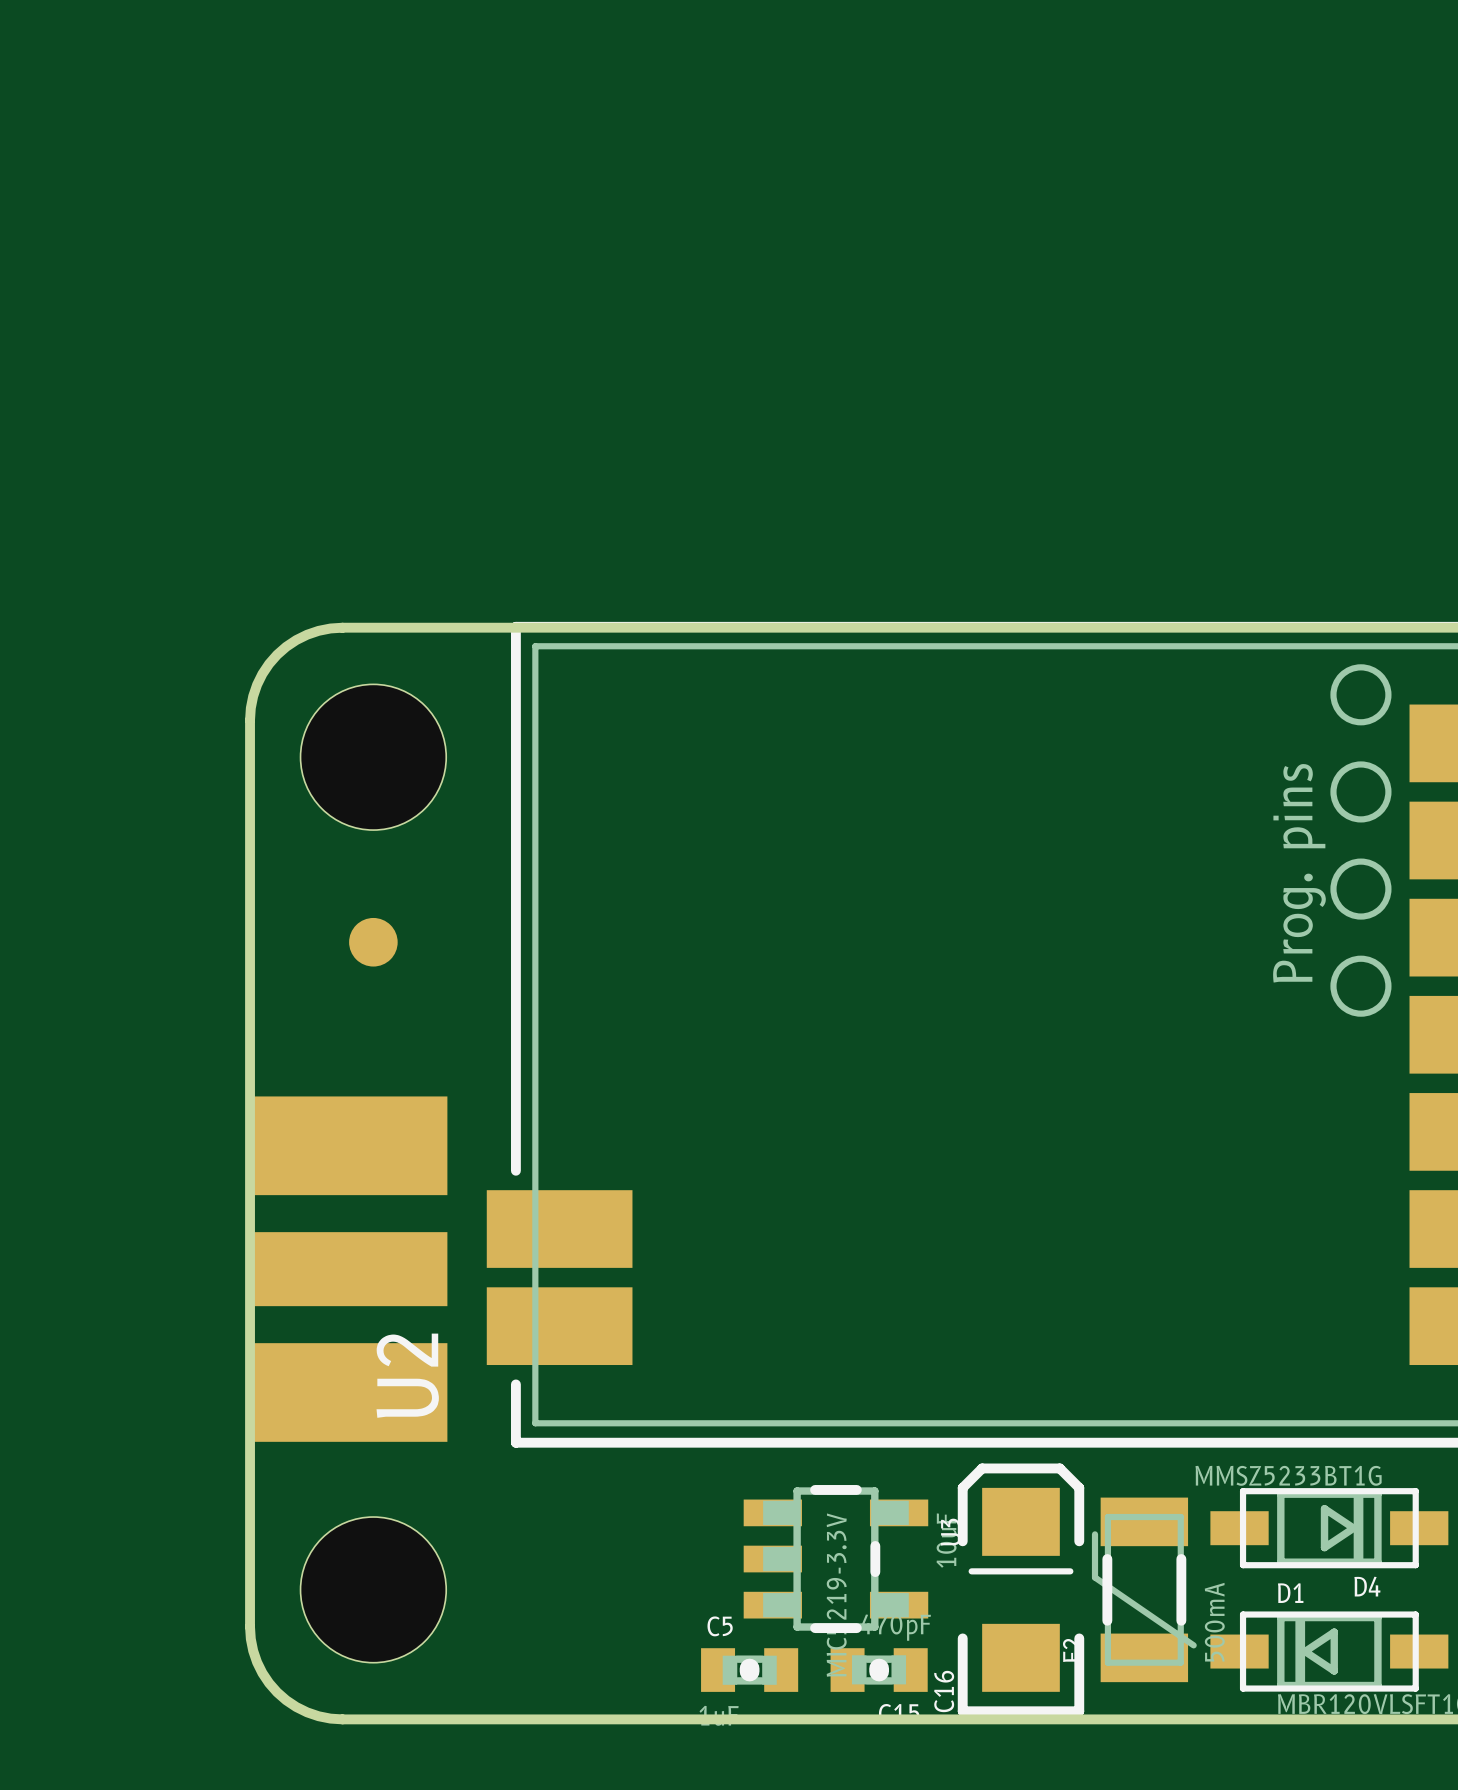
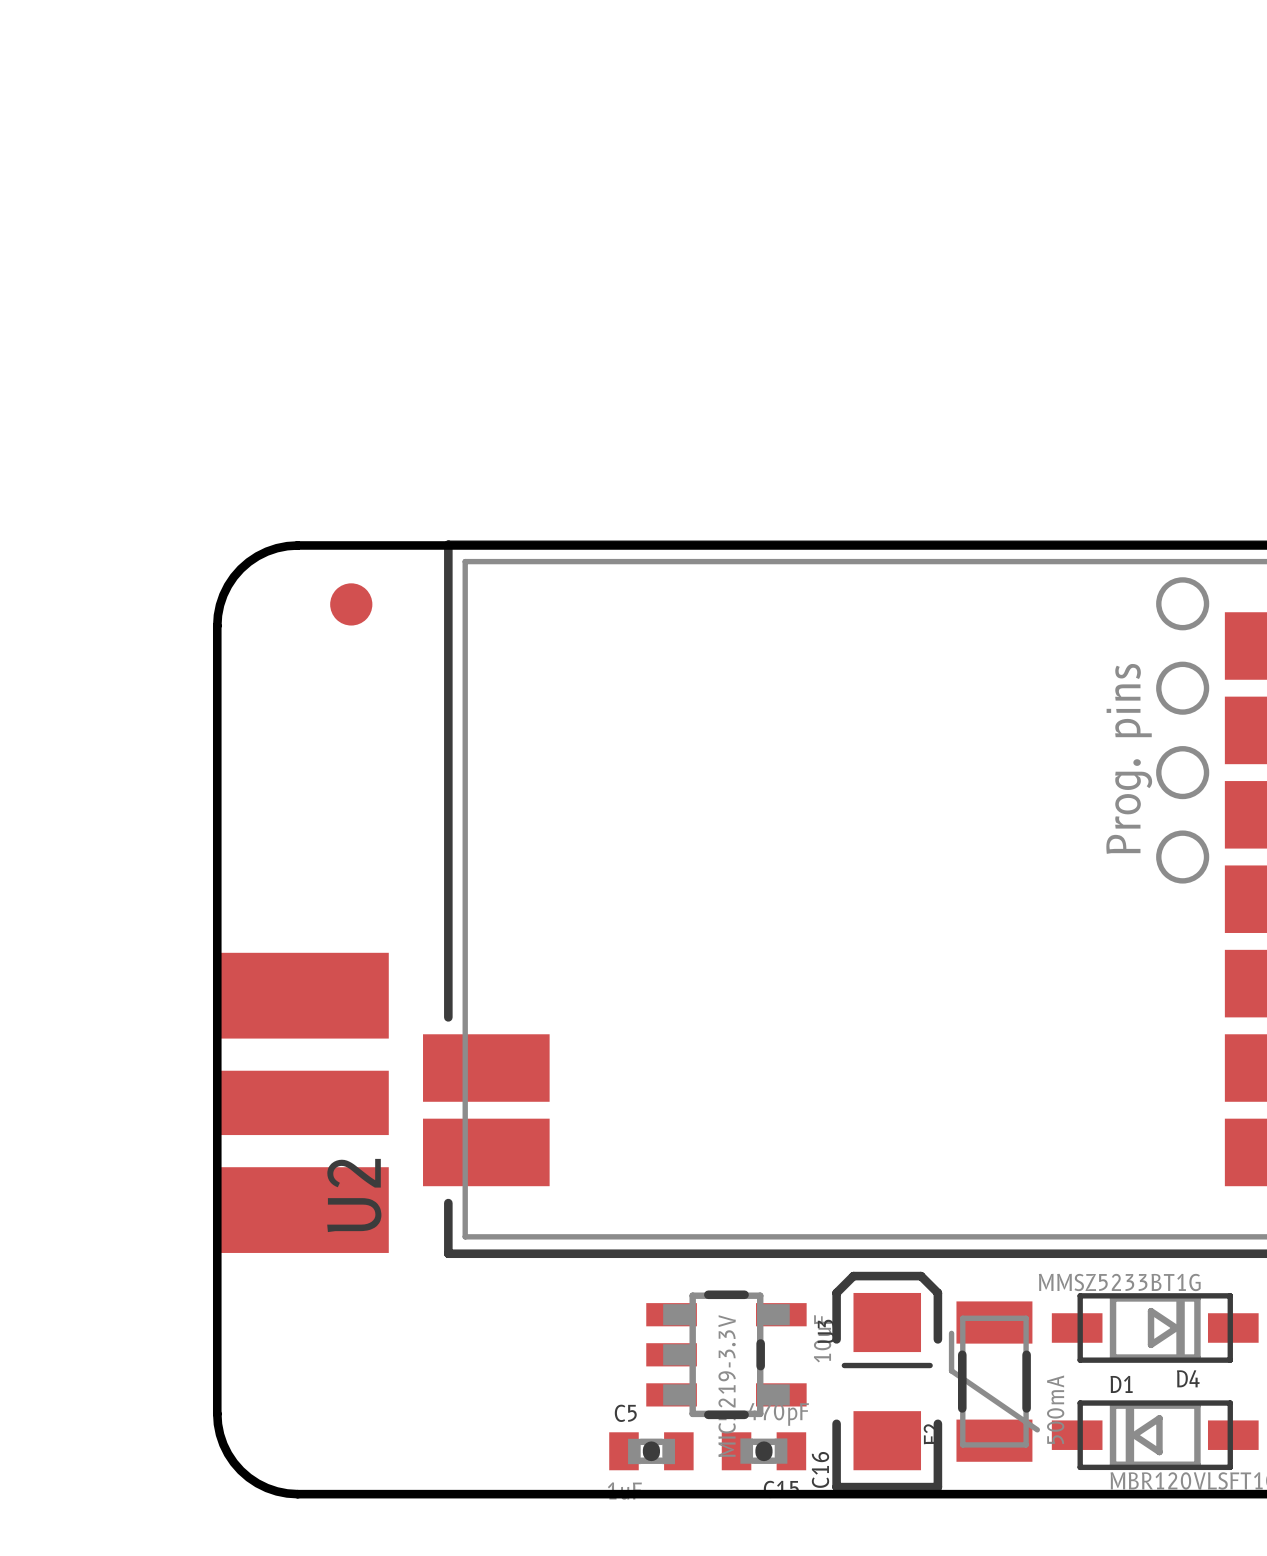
hole: (373, 757) -> none
part position: (373, 942) -> (351, 604)
hole: (373, 1589) -> none

